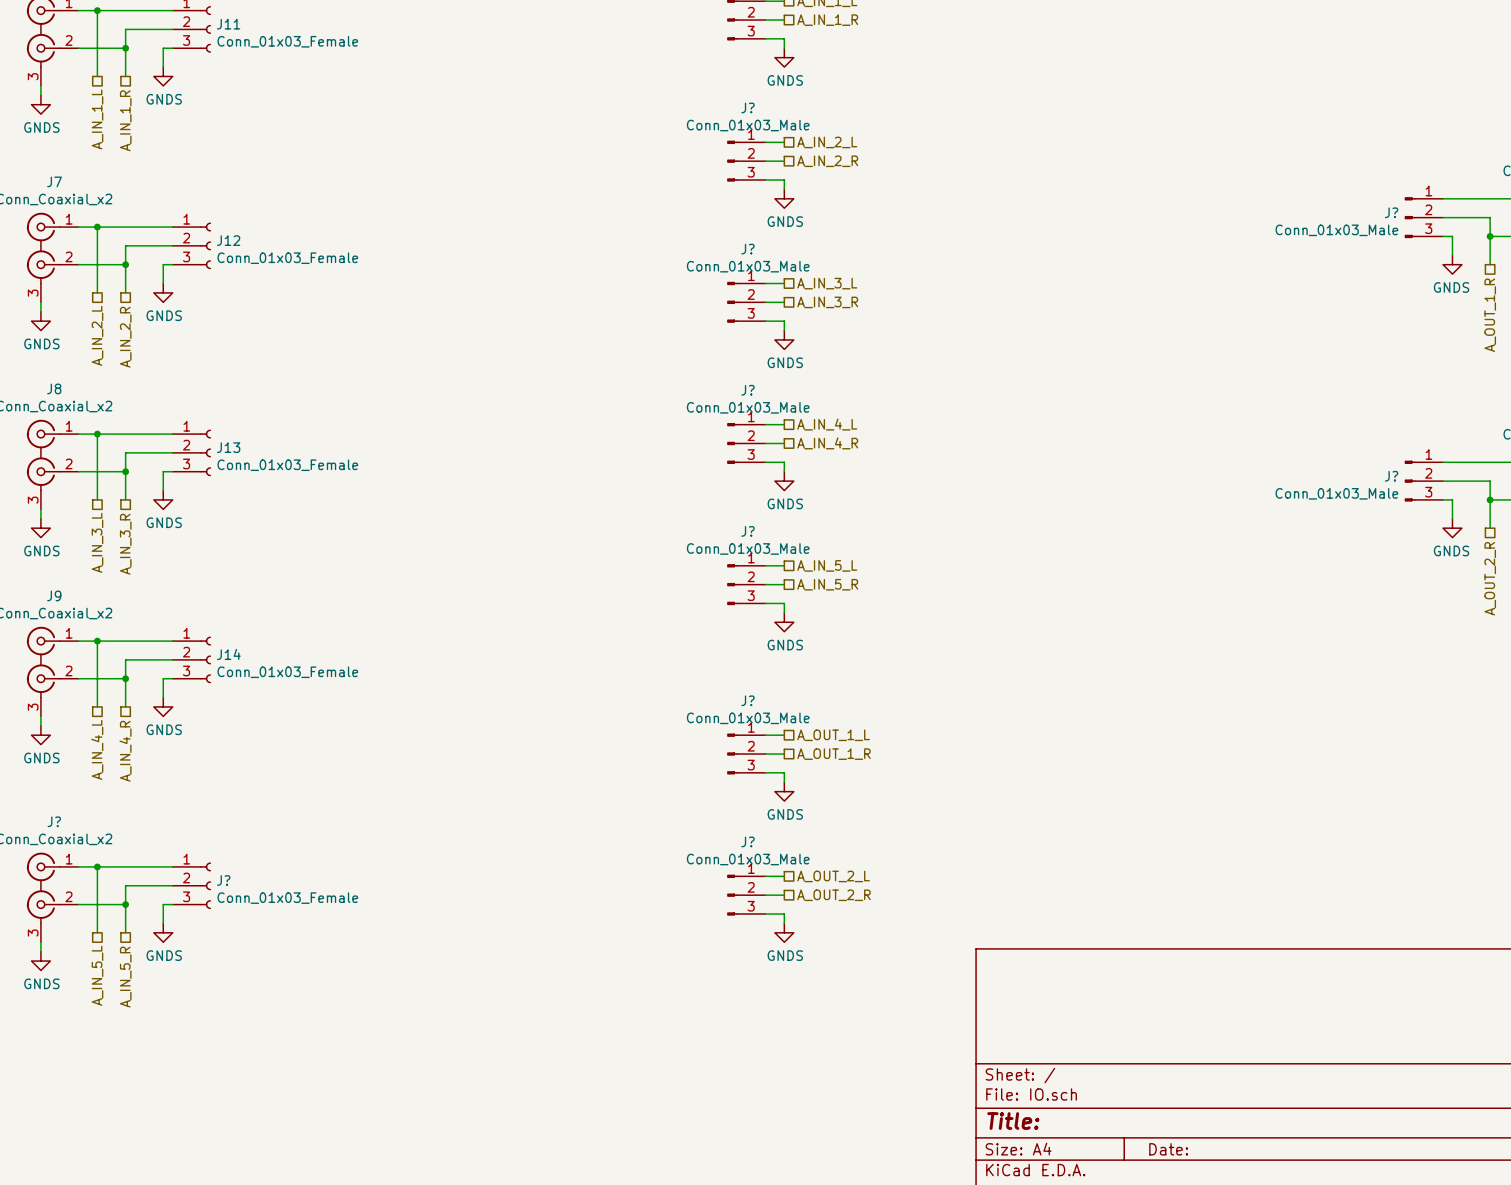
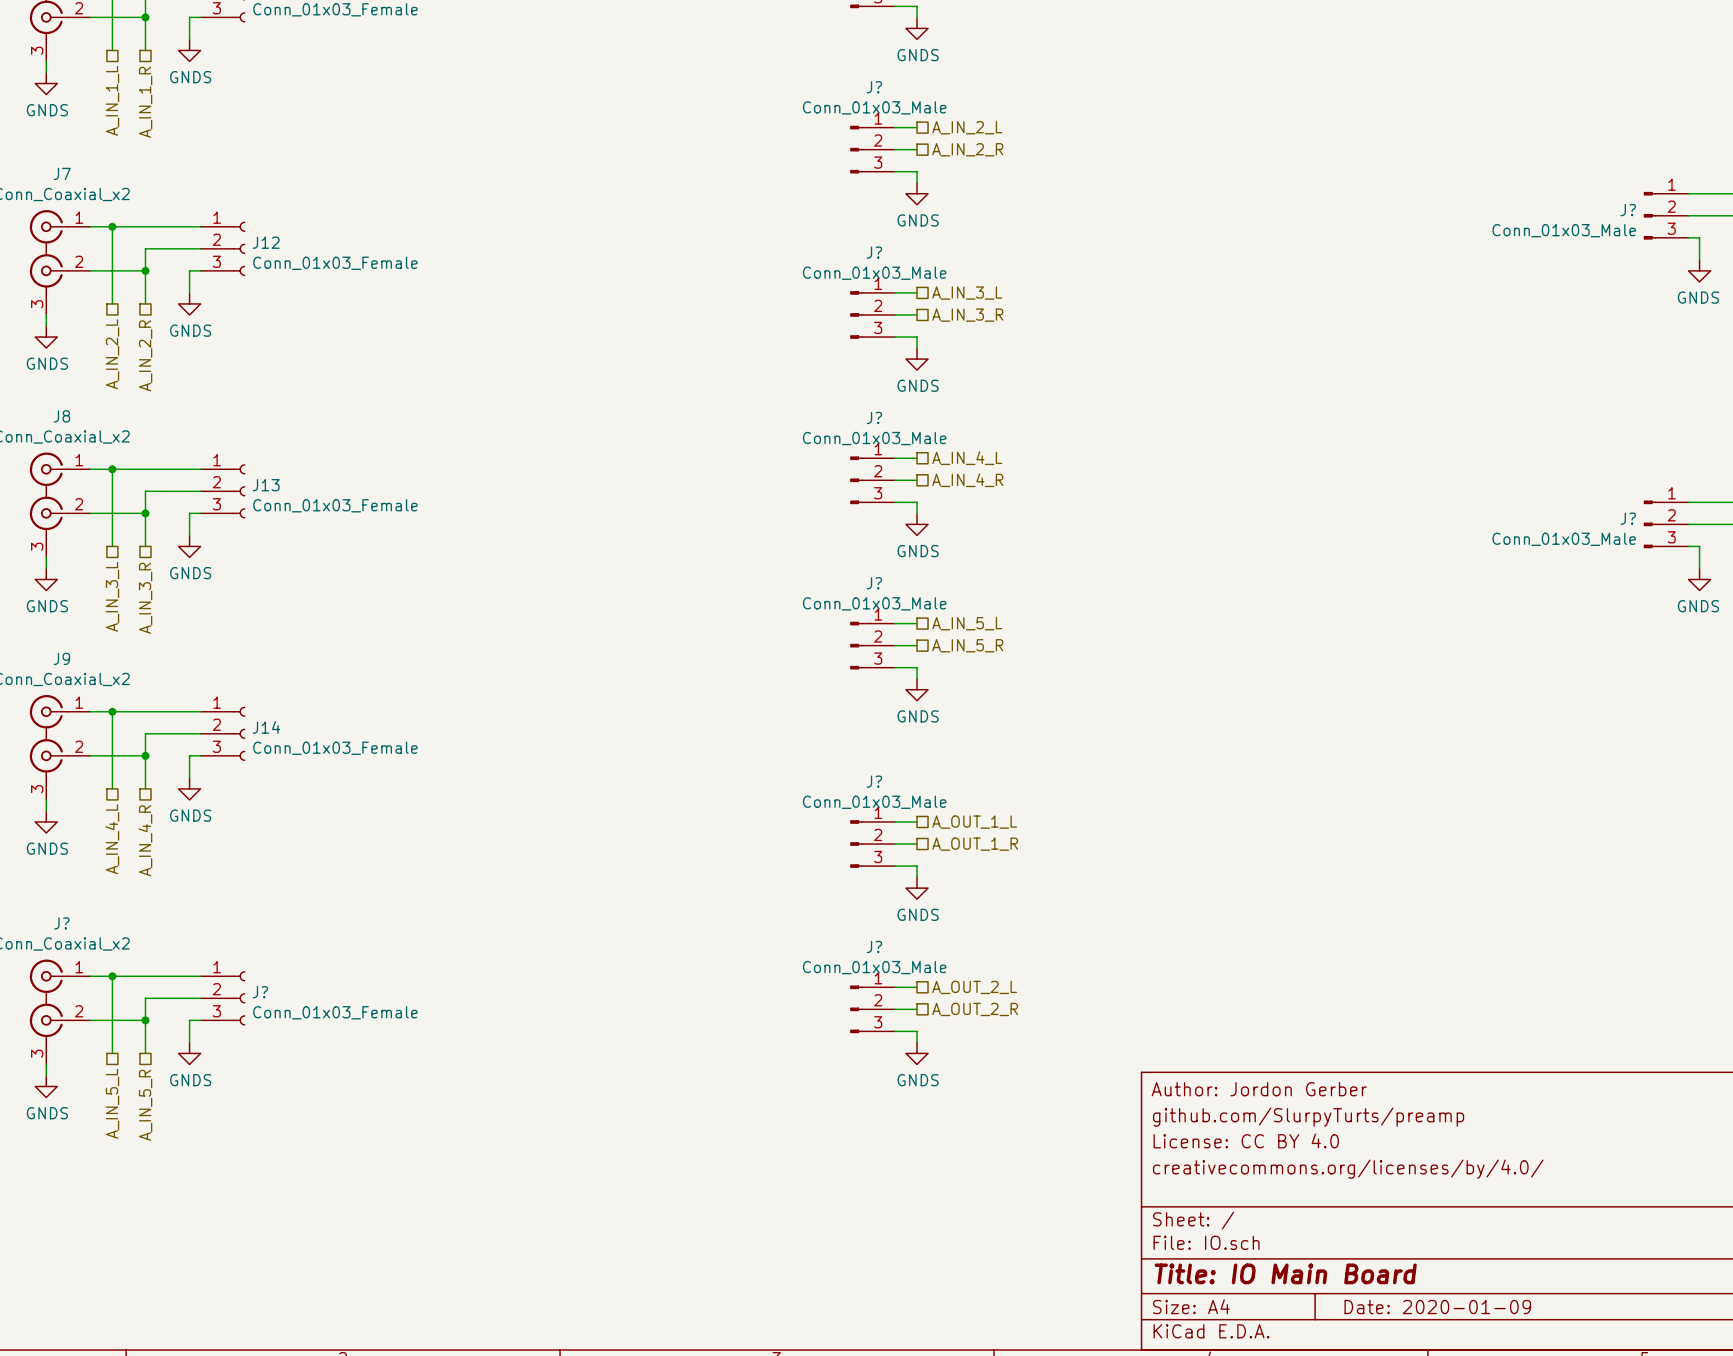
title block: none -> Author: Jordon Gerber (1259, 1089)
title block: none -> github.com/SlurpyTurts/preamp (1308, 1117)
title block: none -> License: CC BY 4.0 (1246, 1140)
title block: none -> creativecommons.org/licenses/by/4.0/ (1348, 1169)
title block: Title: (1013, 1121) -> Title: IO Main Board (1285, 1273)
title block: Date: (1168, 1149) -> Date: 2020-01-09 (1437, 1307)

